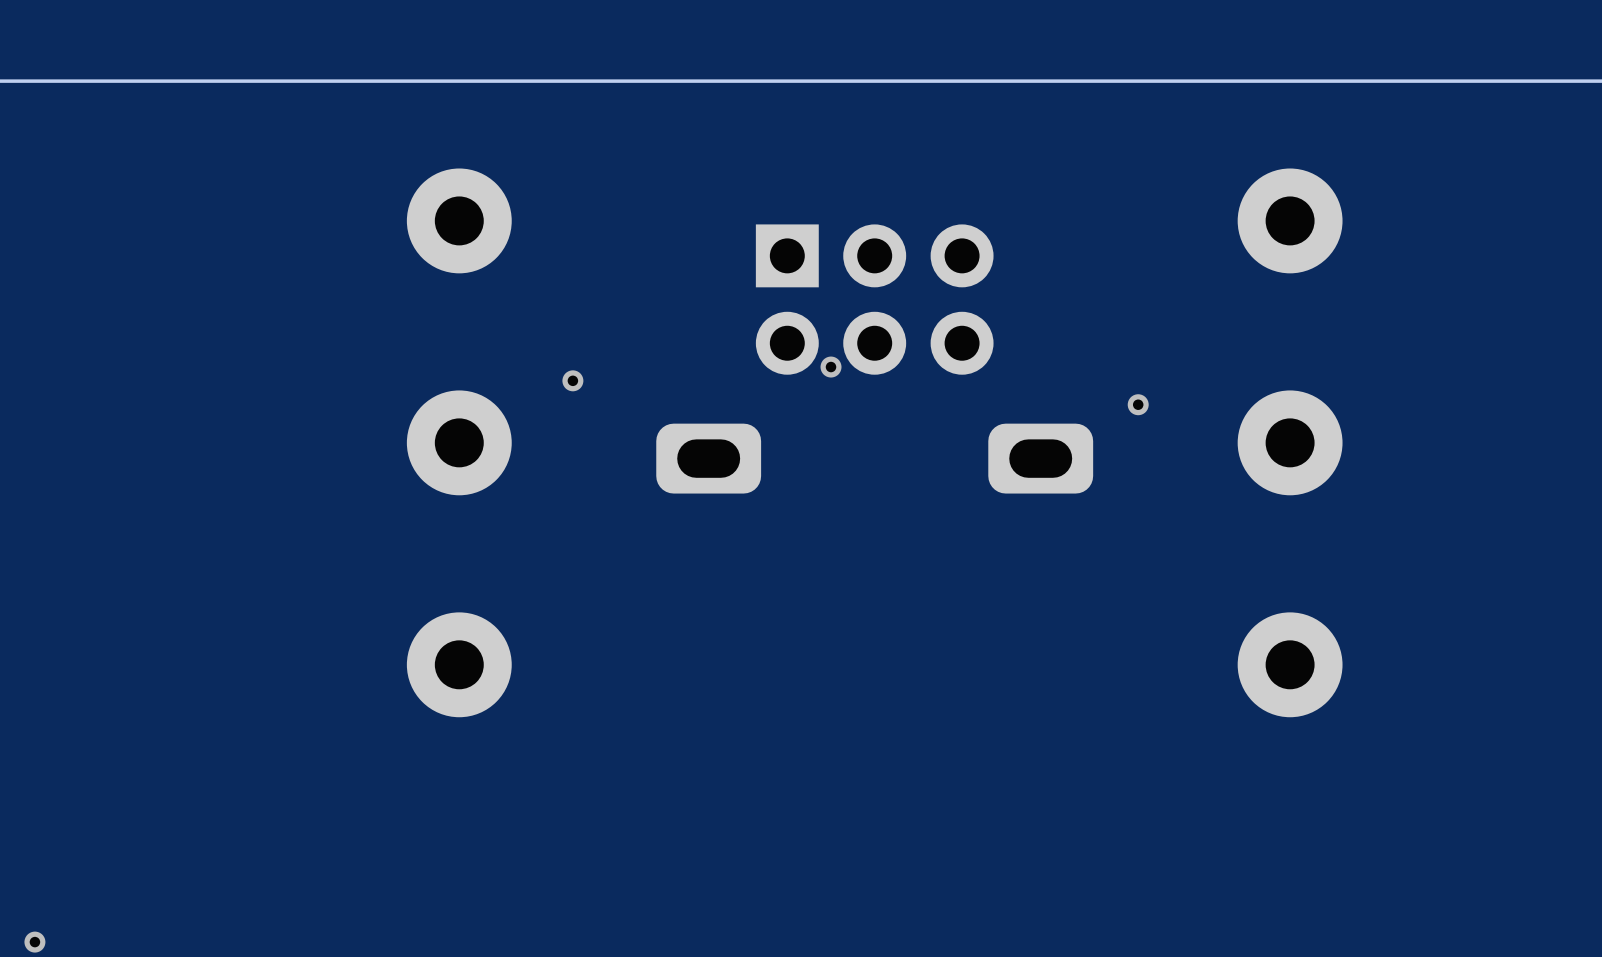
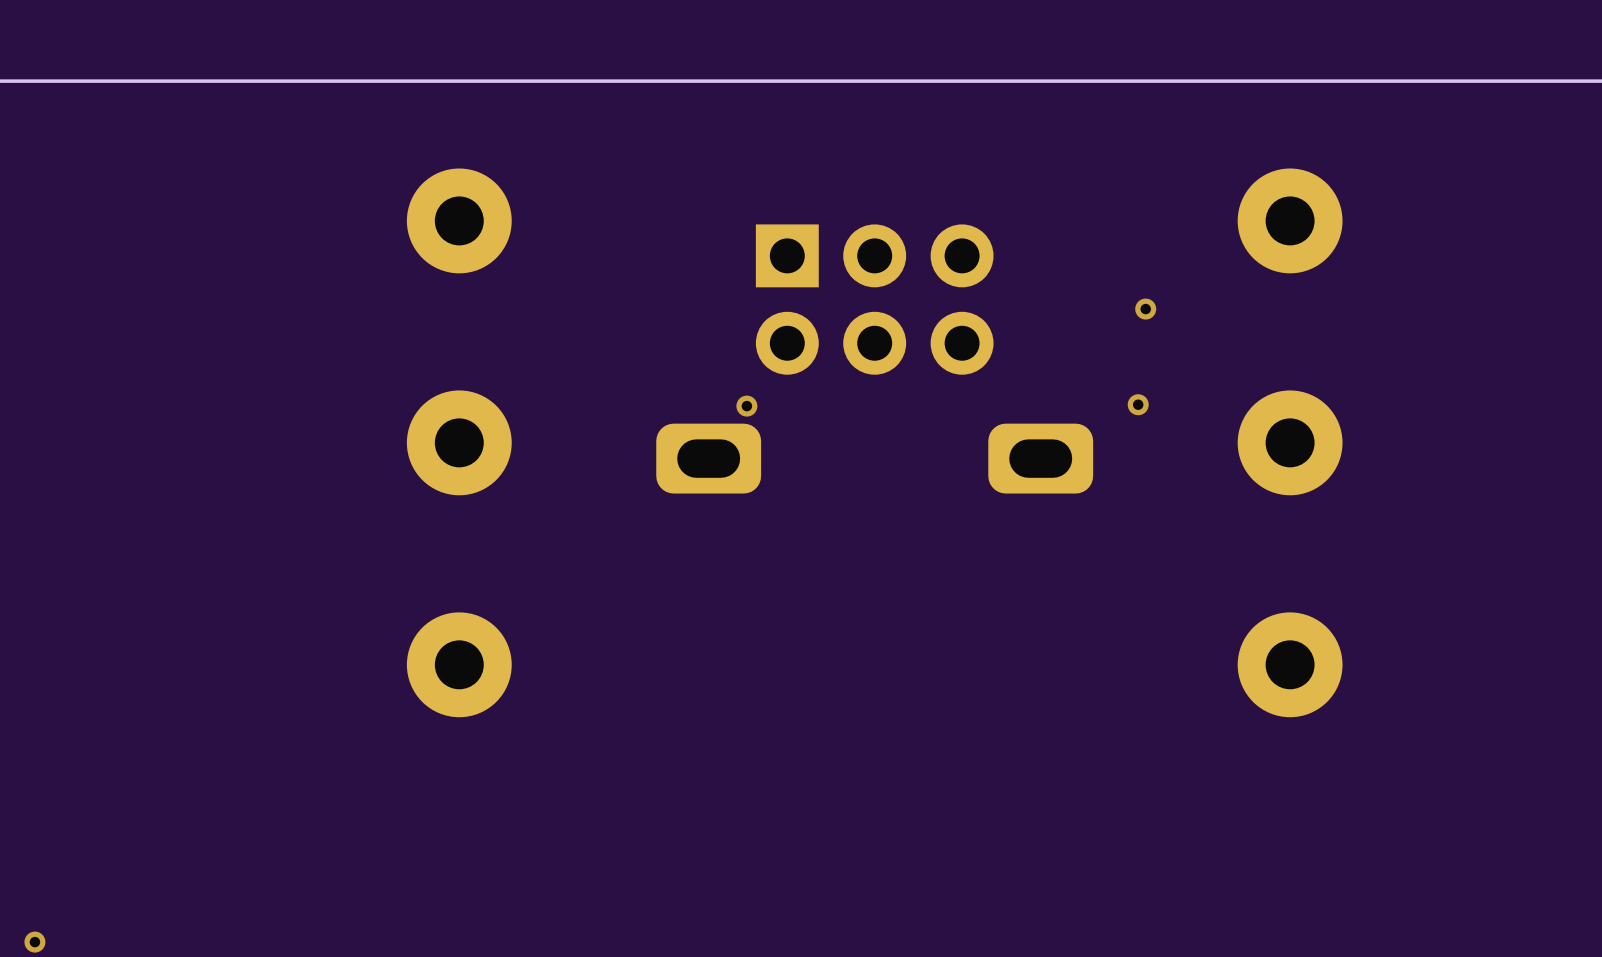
via: none -> (1145, 309)
via: (831, 367) -> none
via: (572, 380) -> none
via: none -> (746, 406)

